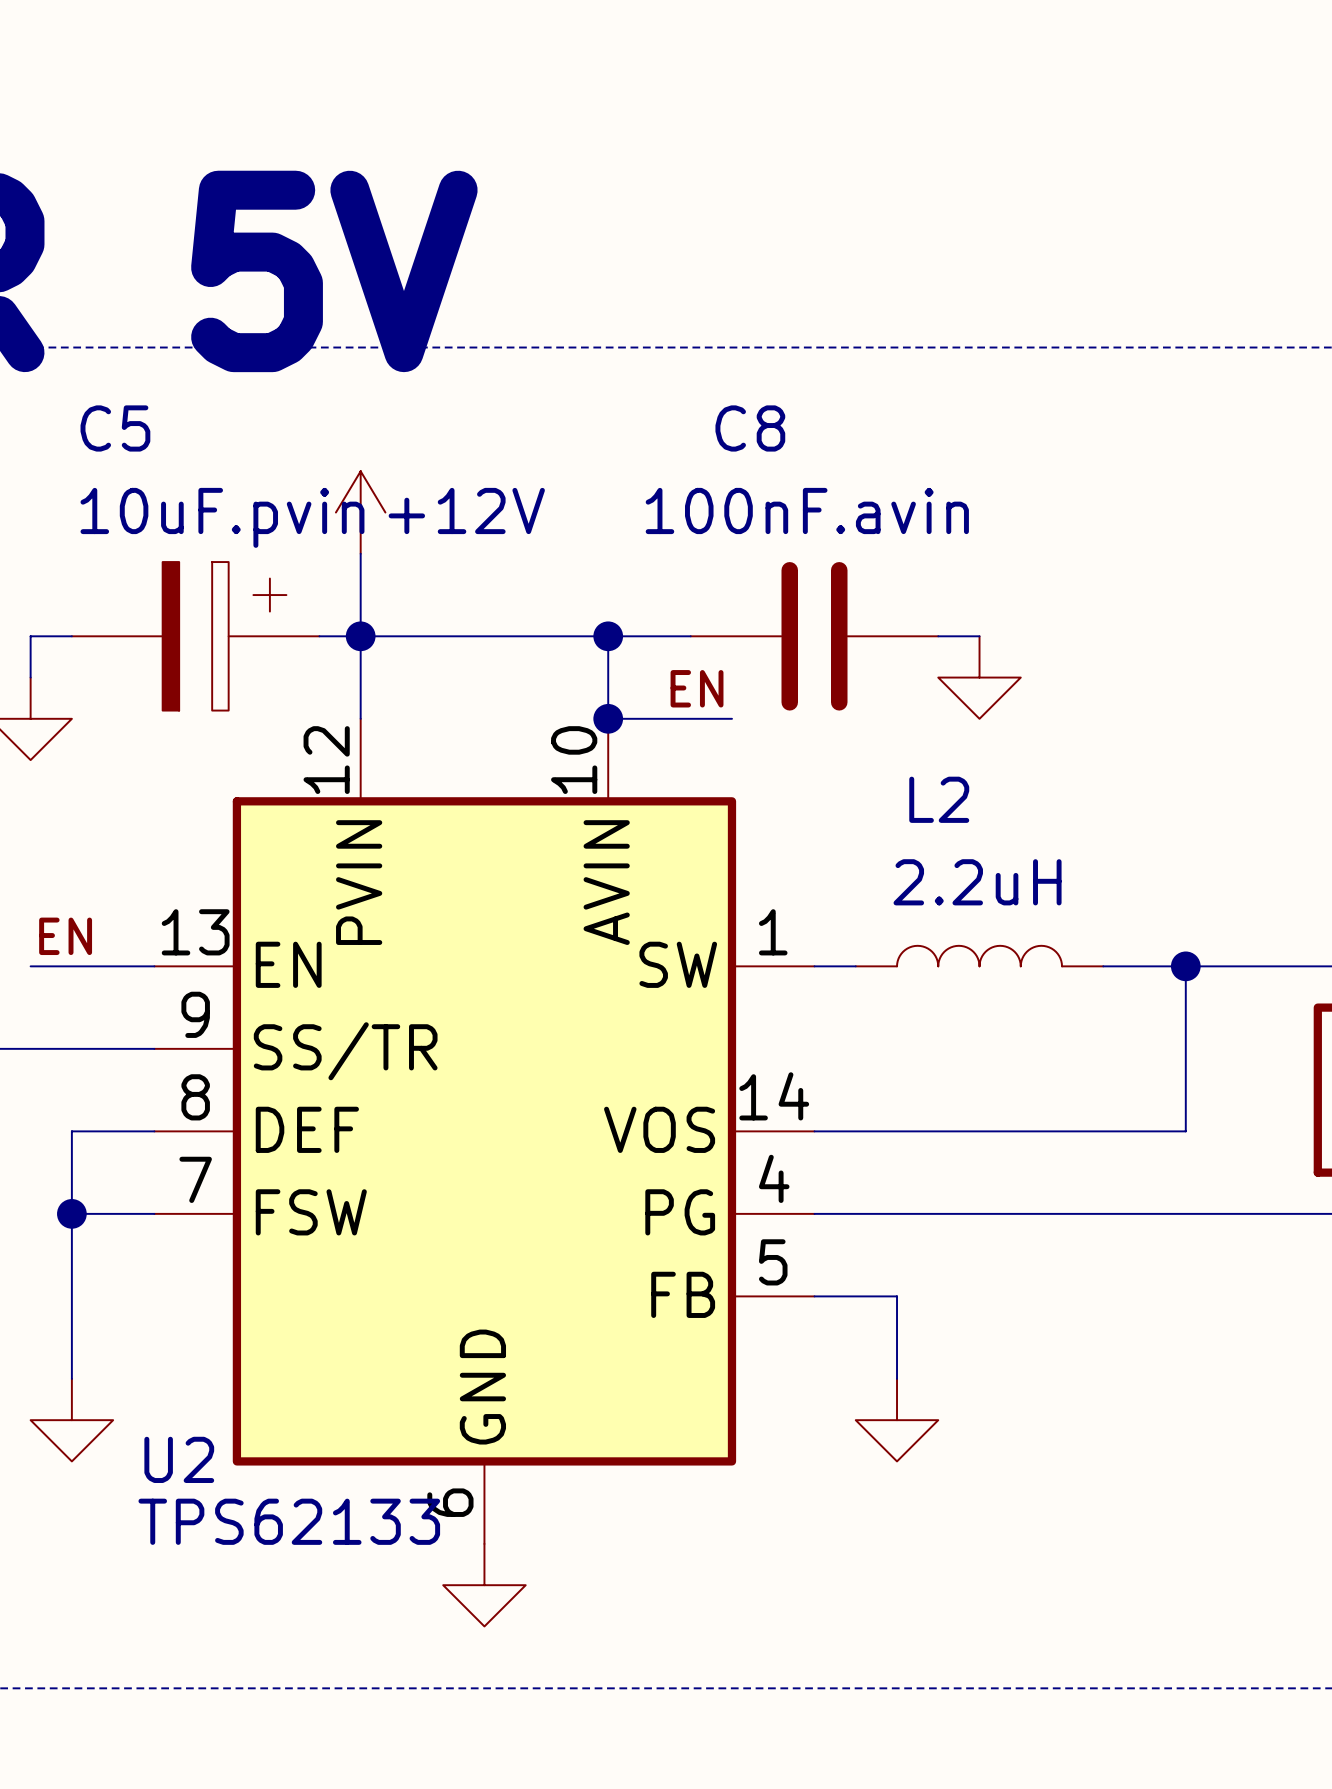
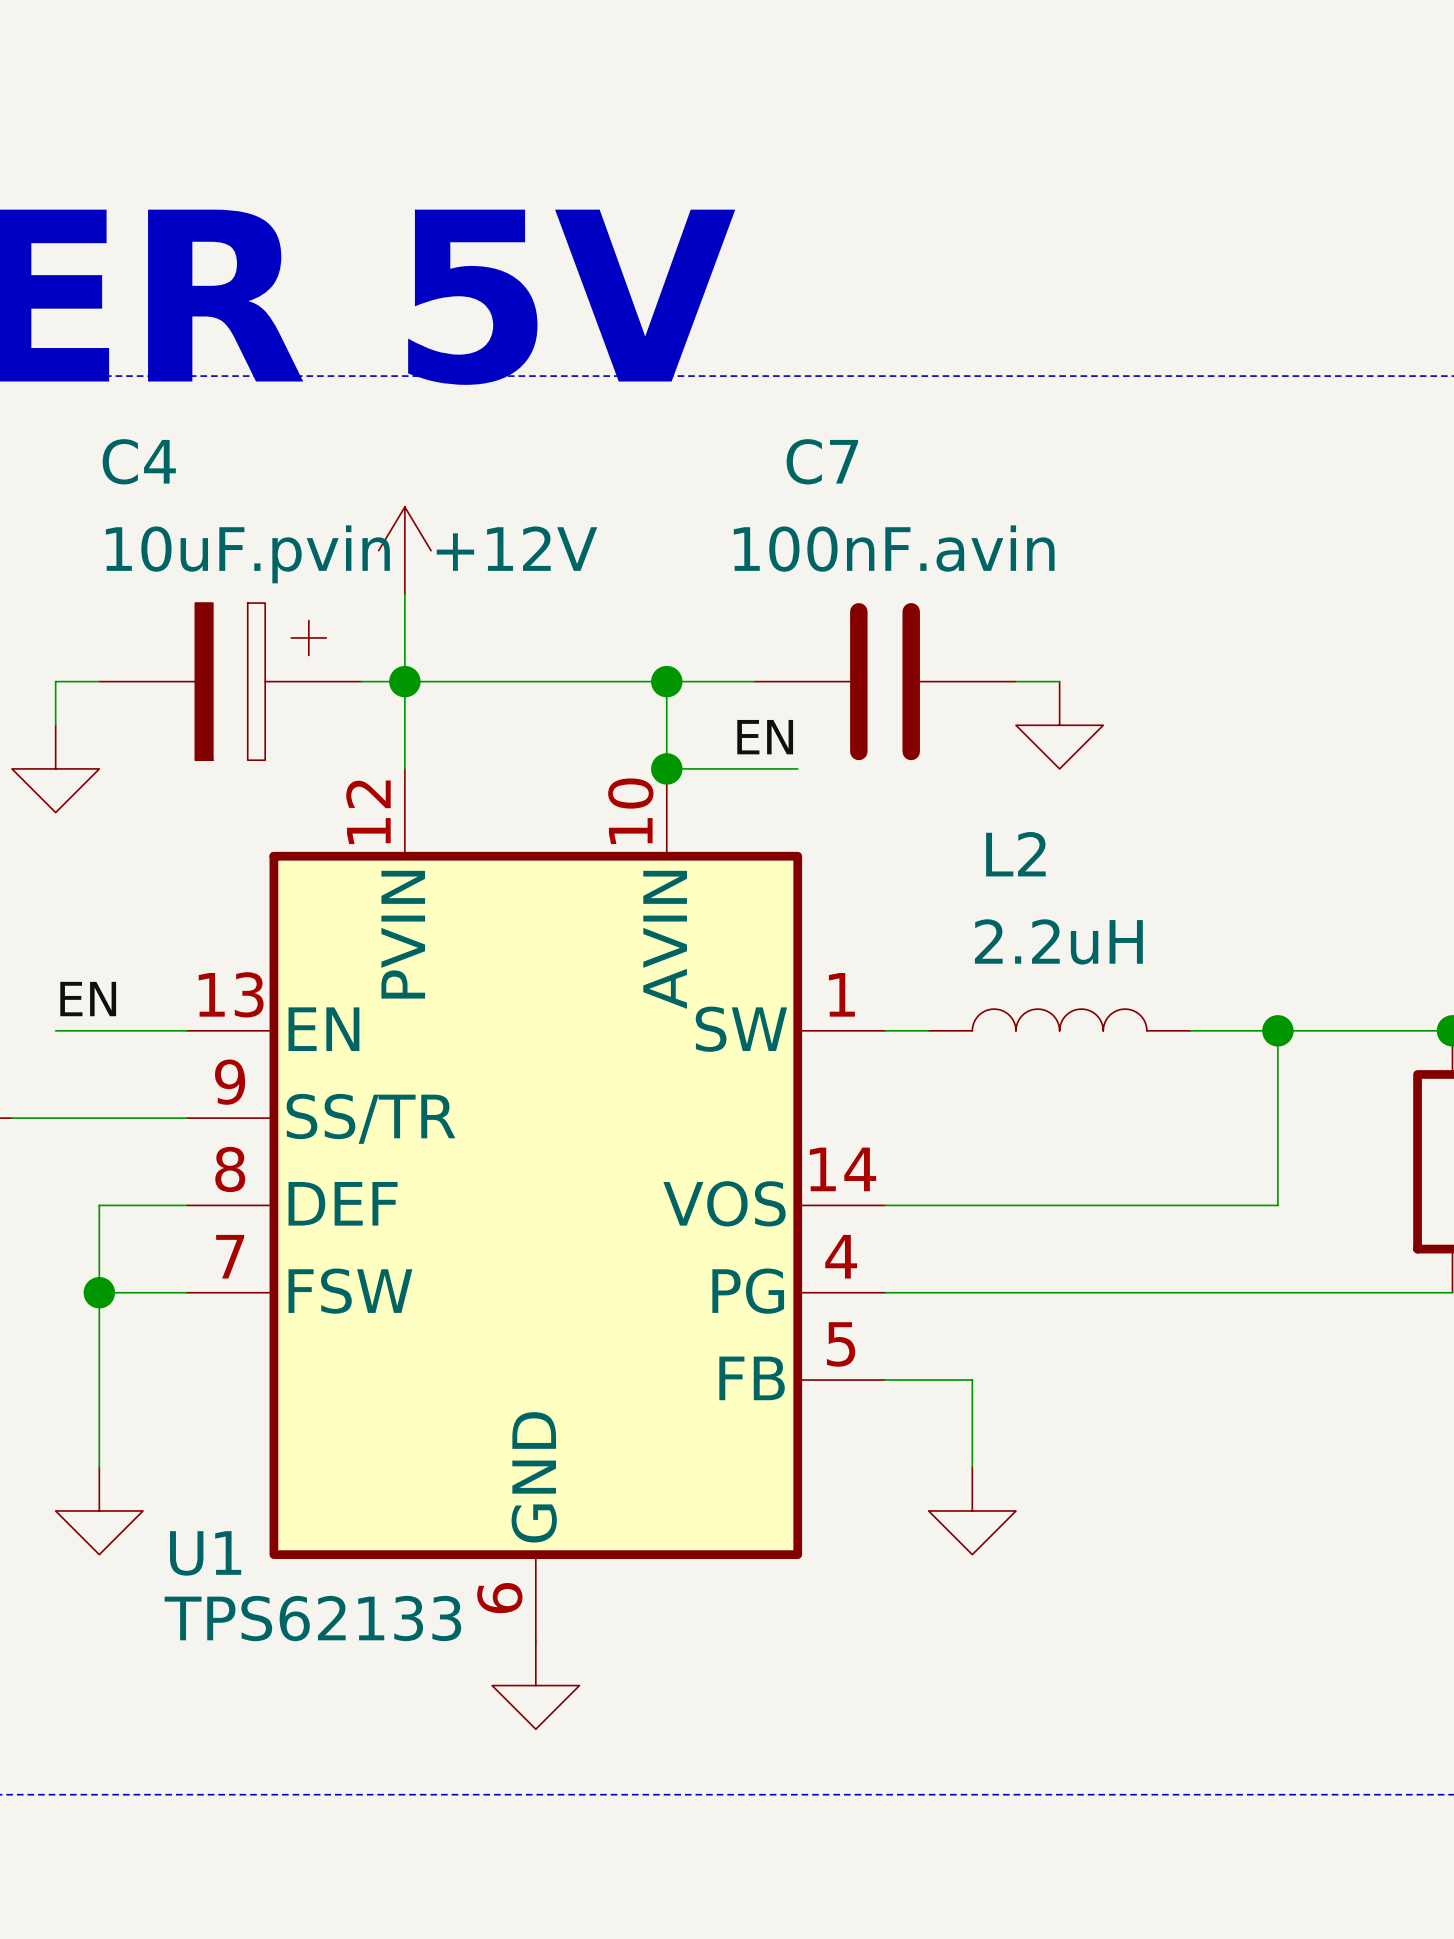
C5 name: C5 (115, 428) -> C4 (139, 461)
C8 name: C8 (750, 428) -> C7 (822, 461)
U2 name: U2 (179, 1459) -> U1 (205, 1553)

